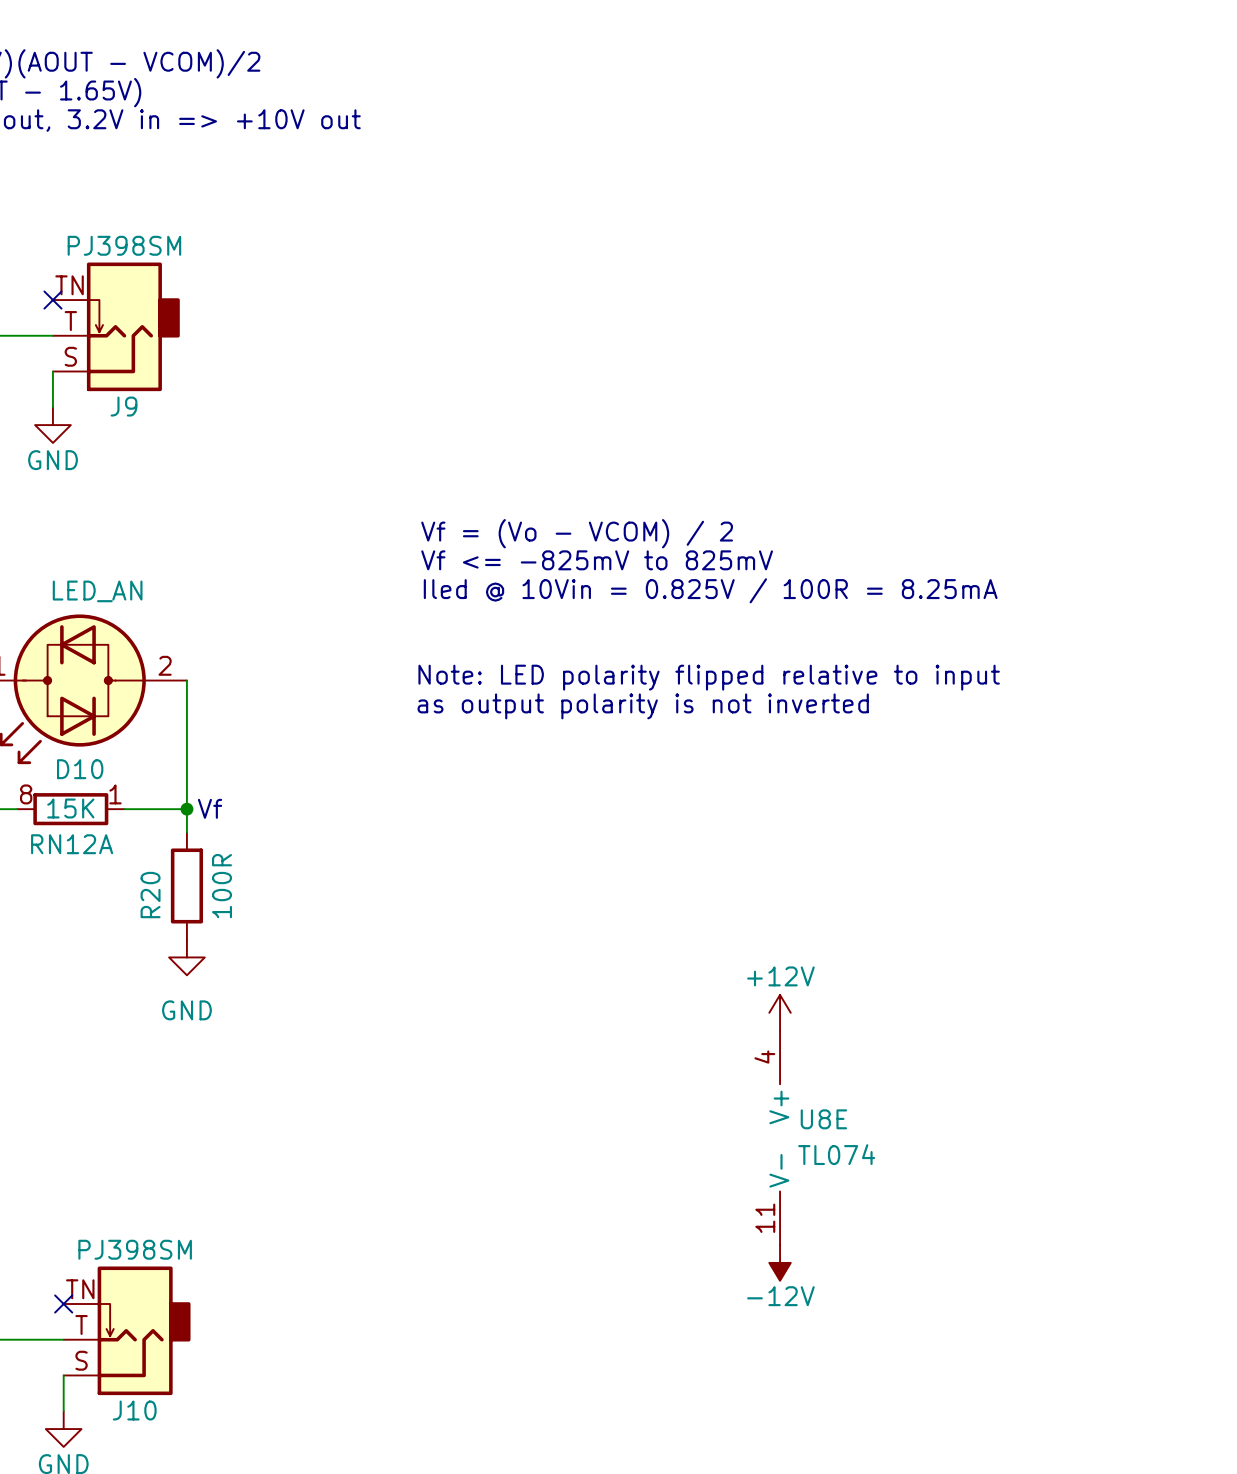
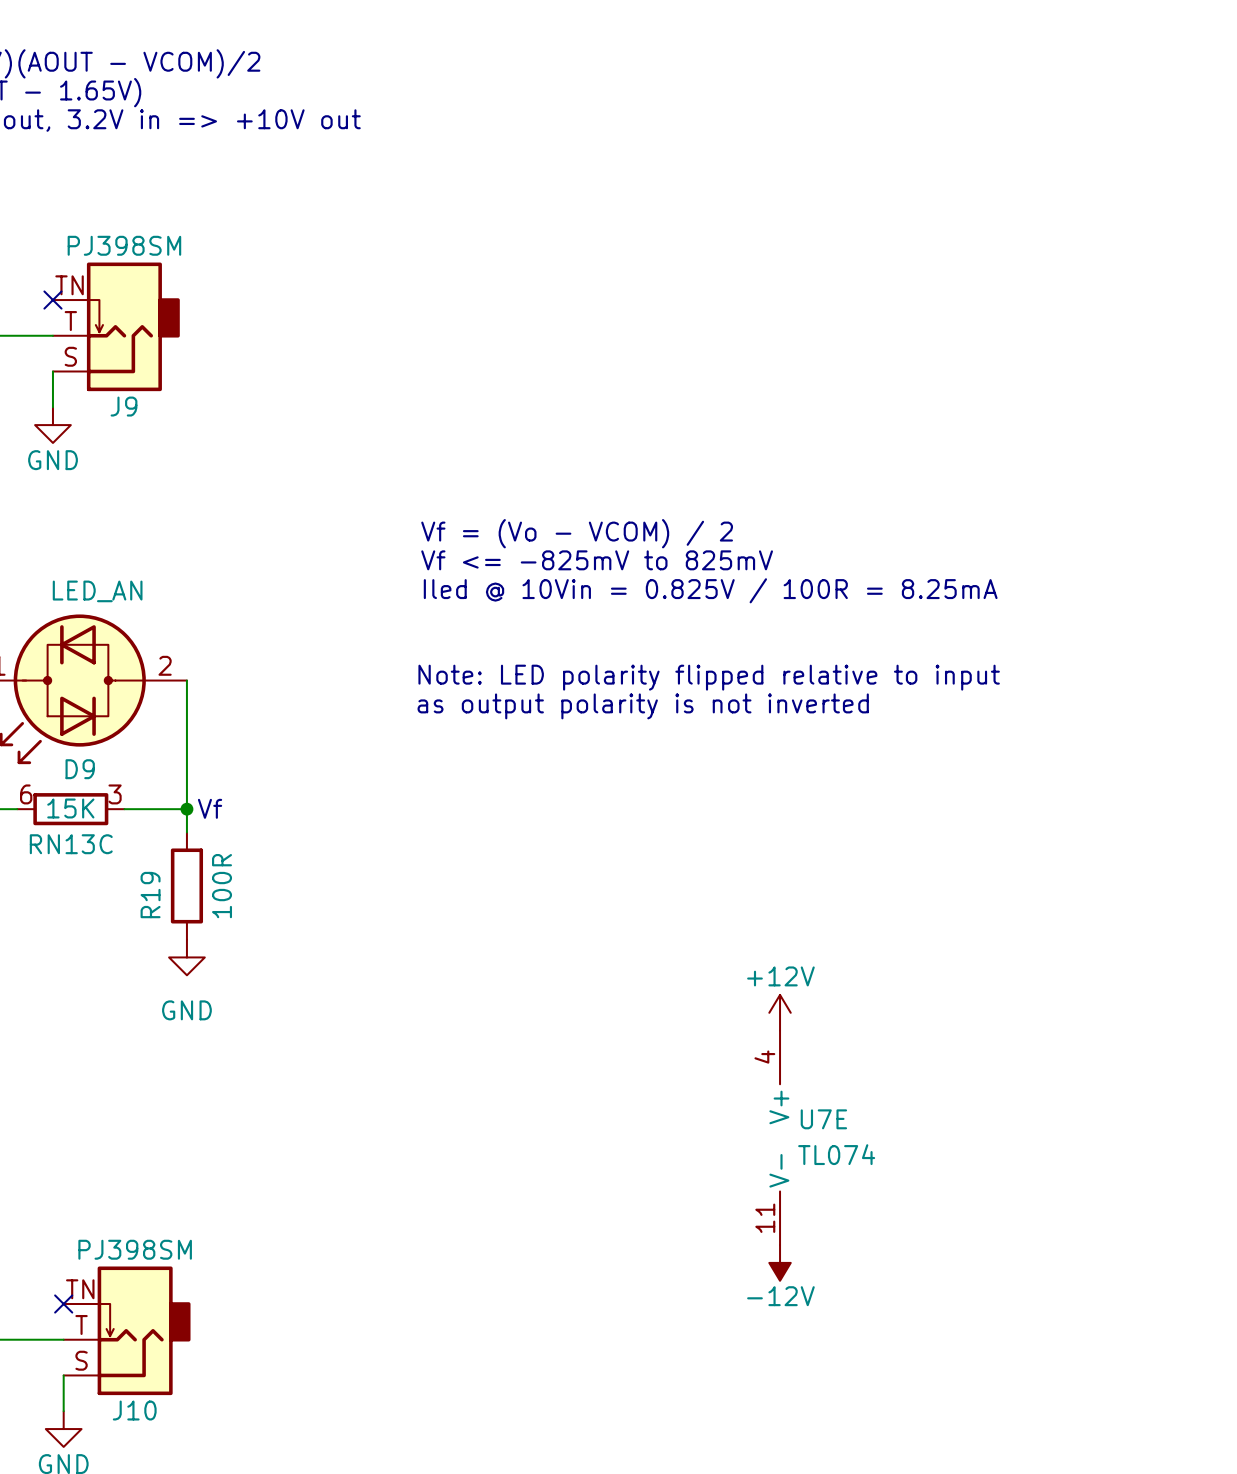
D10 name: D10 (80, 769) -> D9 (80, 769)
RN12A pin number: 8 (26, 794) -> 6 (26, 794)
RN12A pin number: 1 (115, 794) -> 3 (115, 794)
RN12A name: RN12A (72, 844) -> RN13C (71, 844)
R20 name: R20 (150, 895) -> R19 (150, 895)
U8E name: U8E (823, 1119) -> U7E (823, 1119)

